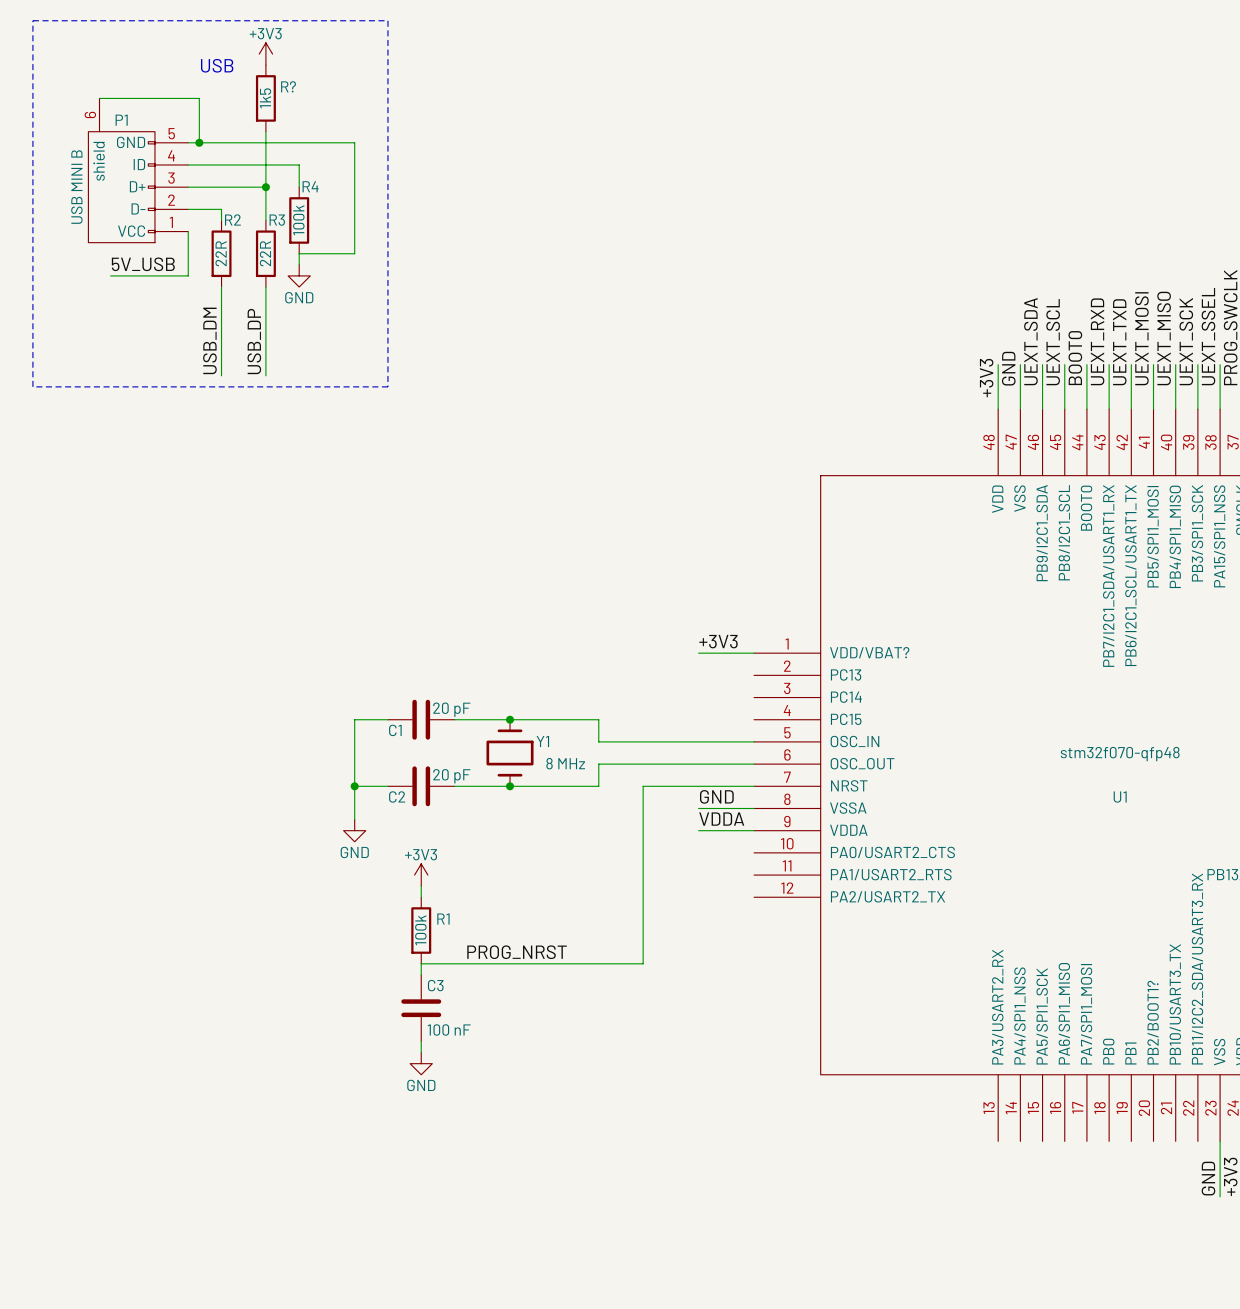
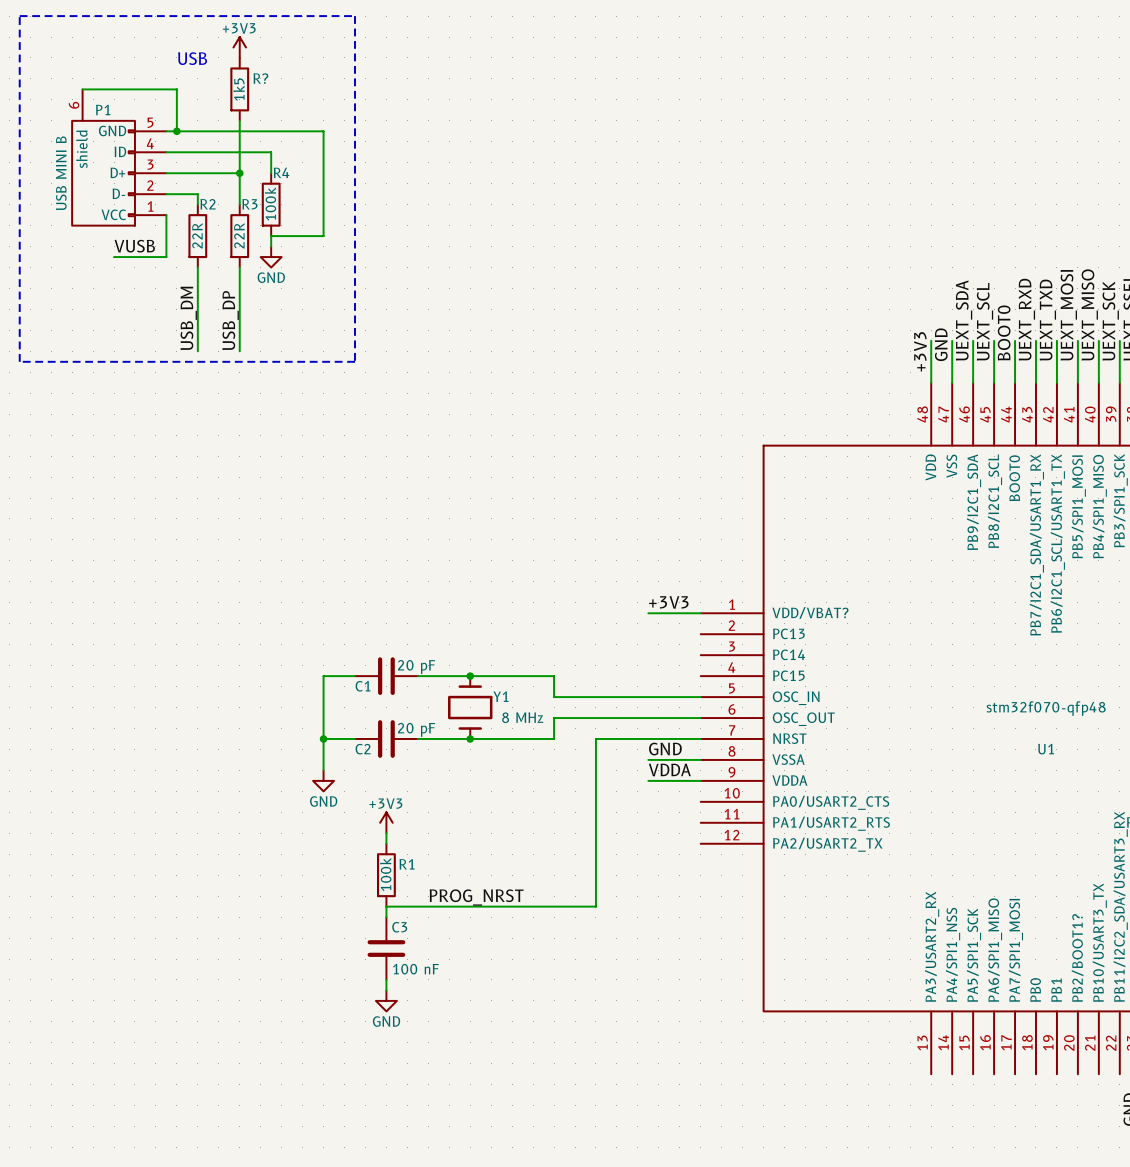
label: 5V_USB (143, 264) -> VUSB (134, 246)
wire: (110, 275) (132, 275) -> none

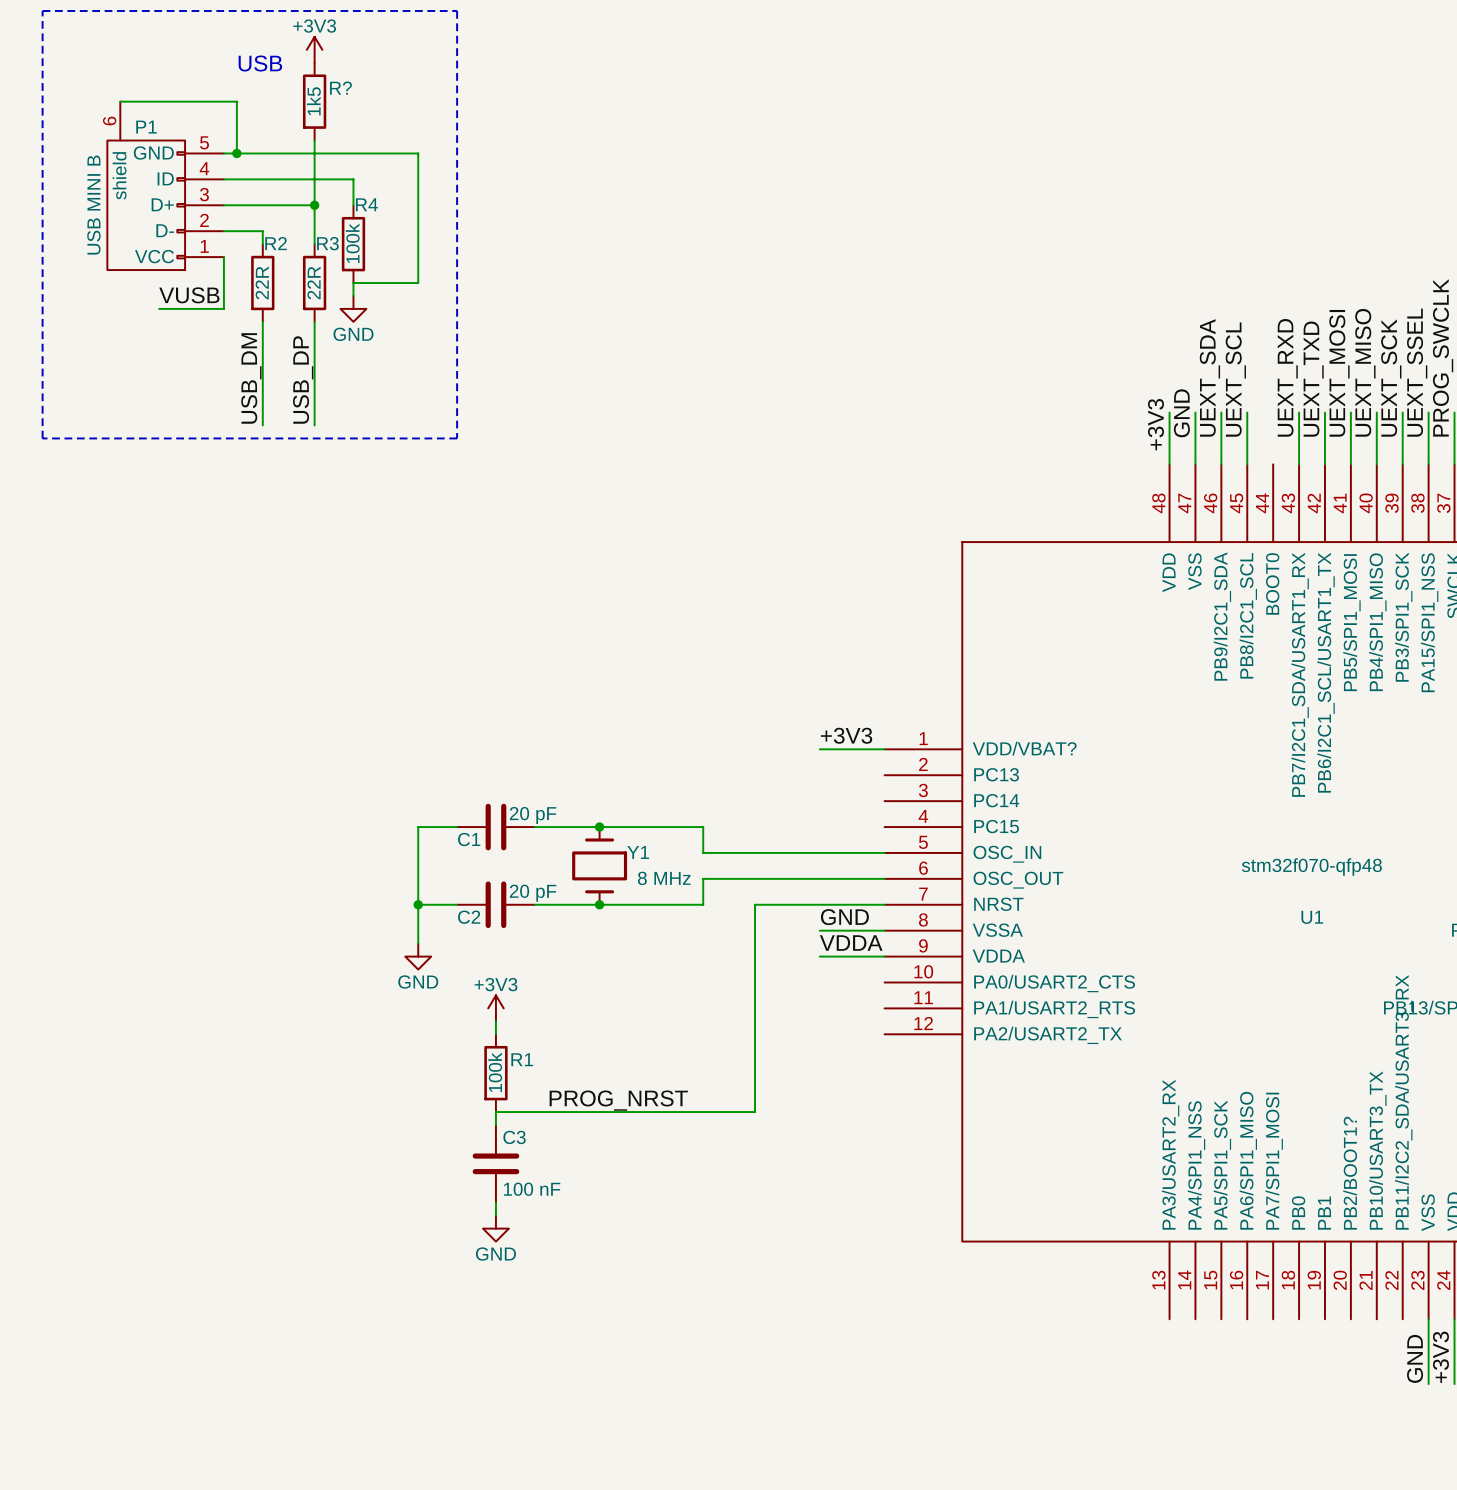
label: BOOT0 (1004, 332) -> none
wire: (1015, 340) (1015, 382) -> none

